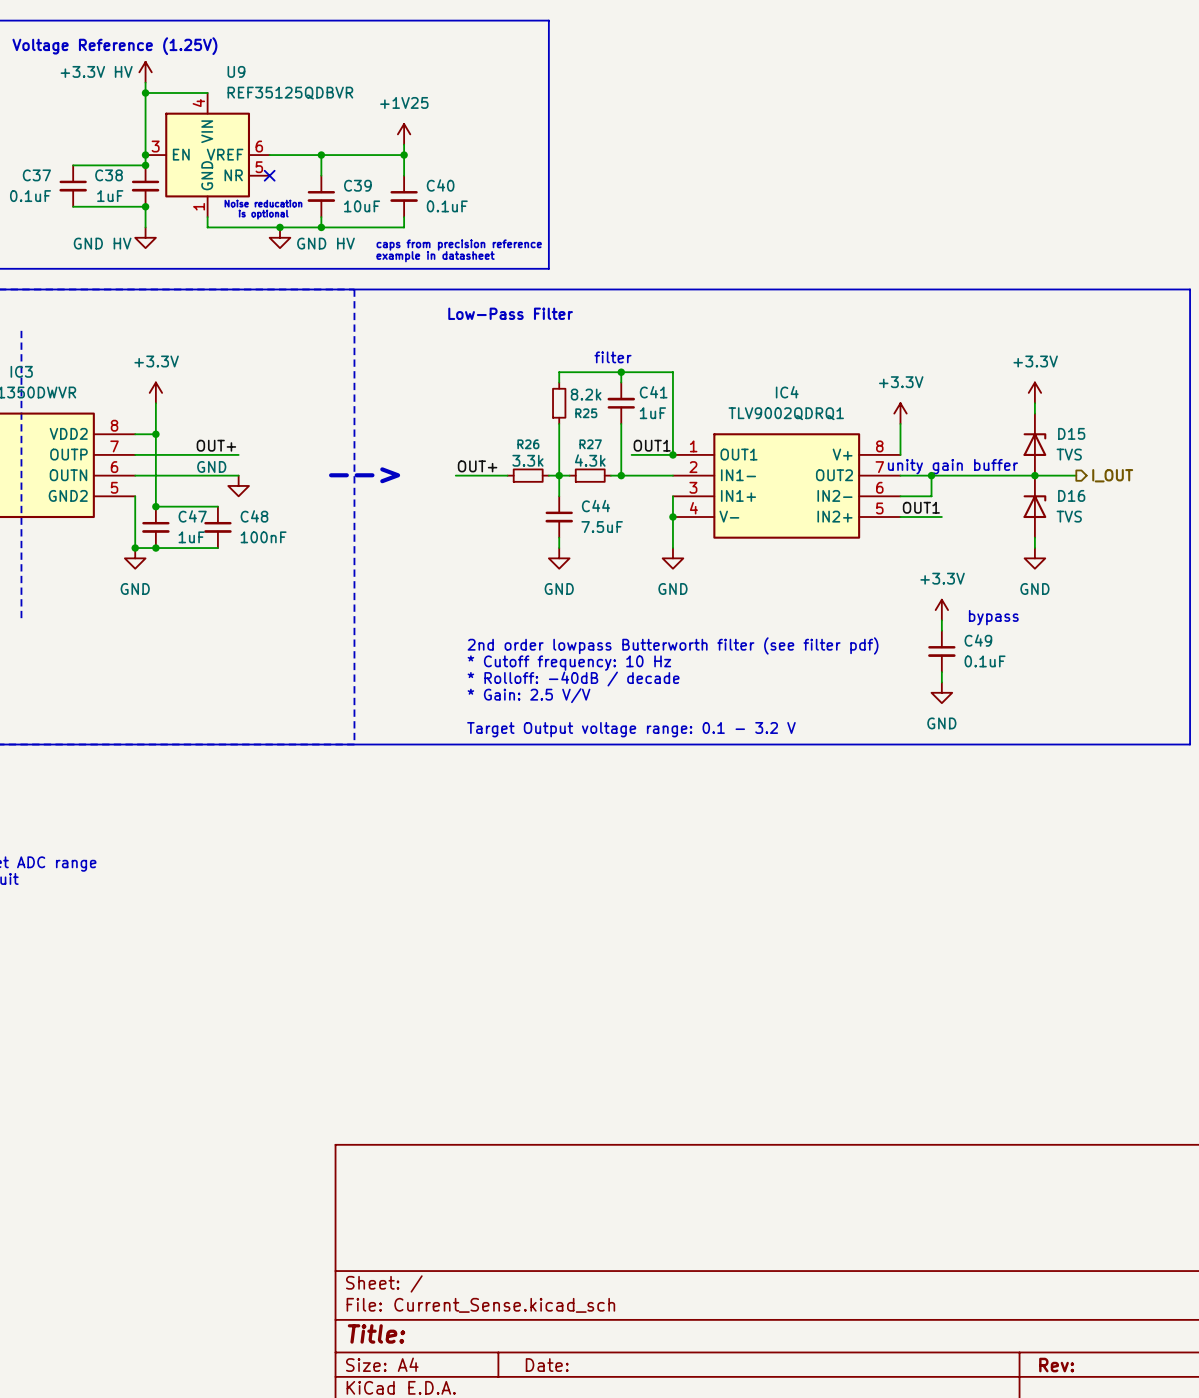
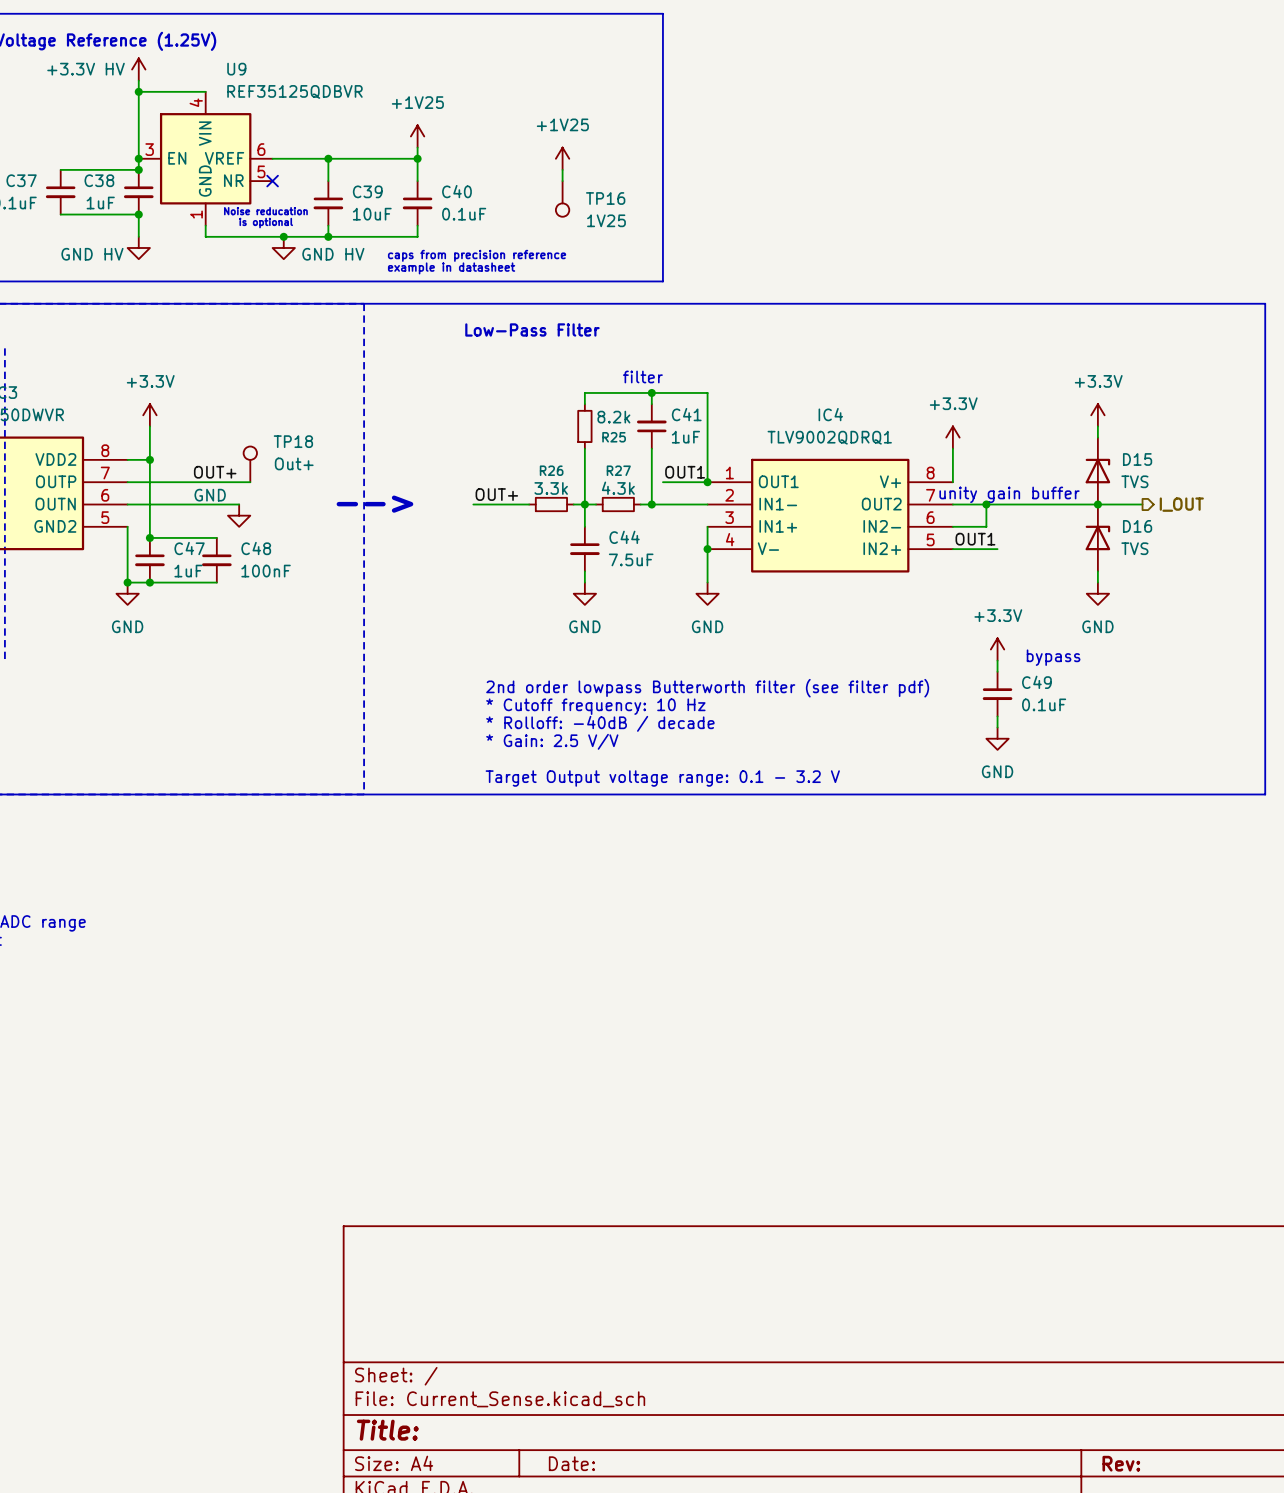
line: (548, 20) (548, 268) -> (573, 13) (662, 13) (662, 281) (573, 281)
power symbol: none -> +1V25 (562, 158)
wire: none -> (562, 169) (562, 181)
TP16: none -> 1V25 (562, 198)
TP18: none -> Out+ (250, 464)
wire: none -> (239, 482) (250, 482)

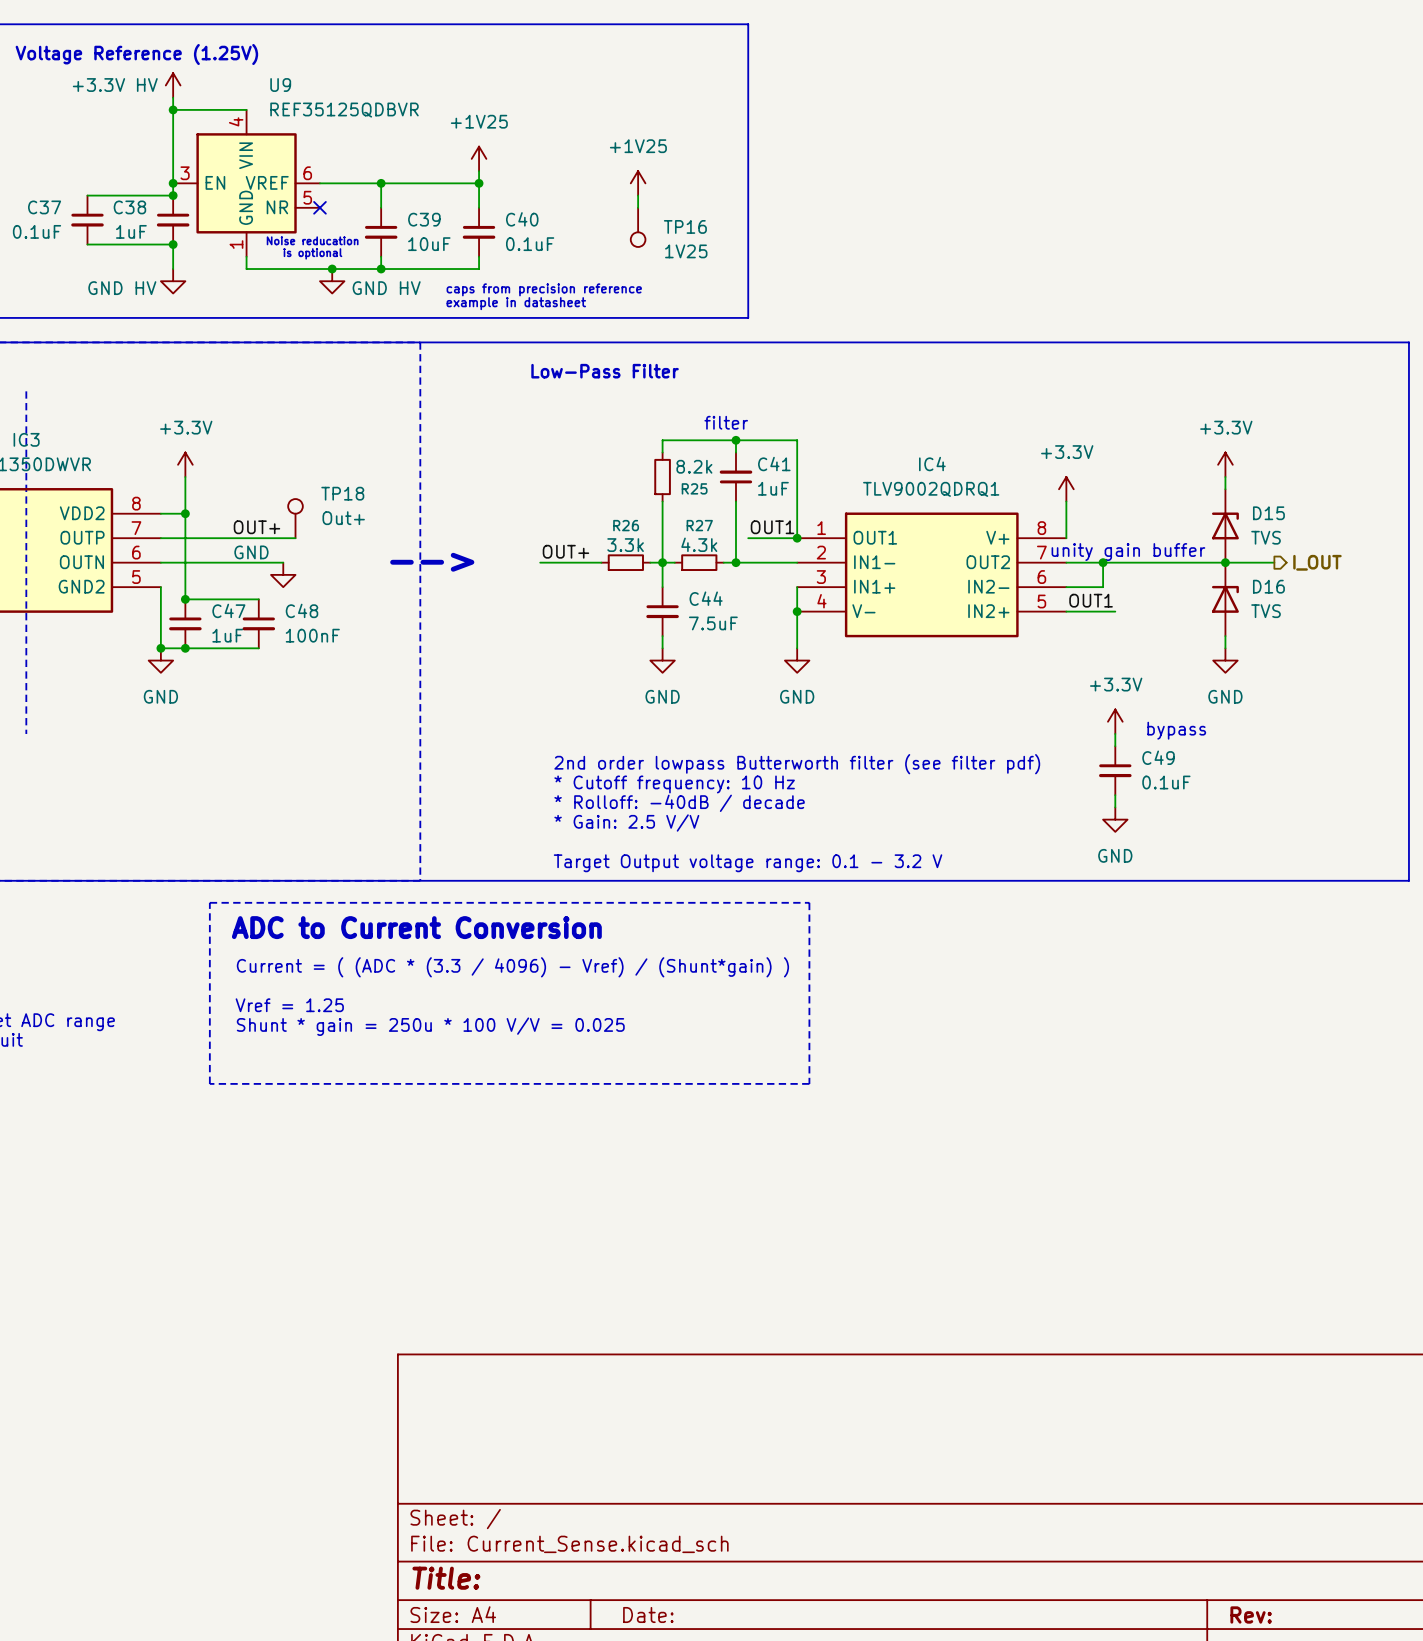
line: none -> (209, 902) (809, 902) (809, 1083) (209, 1083) (209, 902)
text: none -> ADC to Current Conversion (416, 927)
text: none -> Current = ( (ADC * (3.3 / 4096) - Vref) / (Shunt*gain) ) (512, 967)
text: none -> Vref = 1.25 (289, 1005)
text: none -> Shunt * gain = 250u * 100 V/V = 0.025 (430, 1026)

